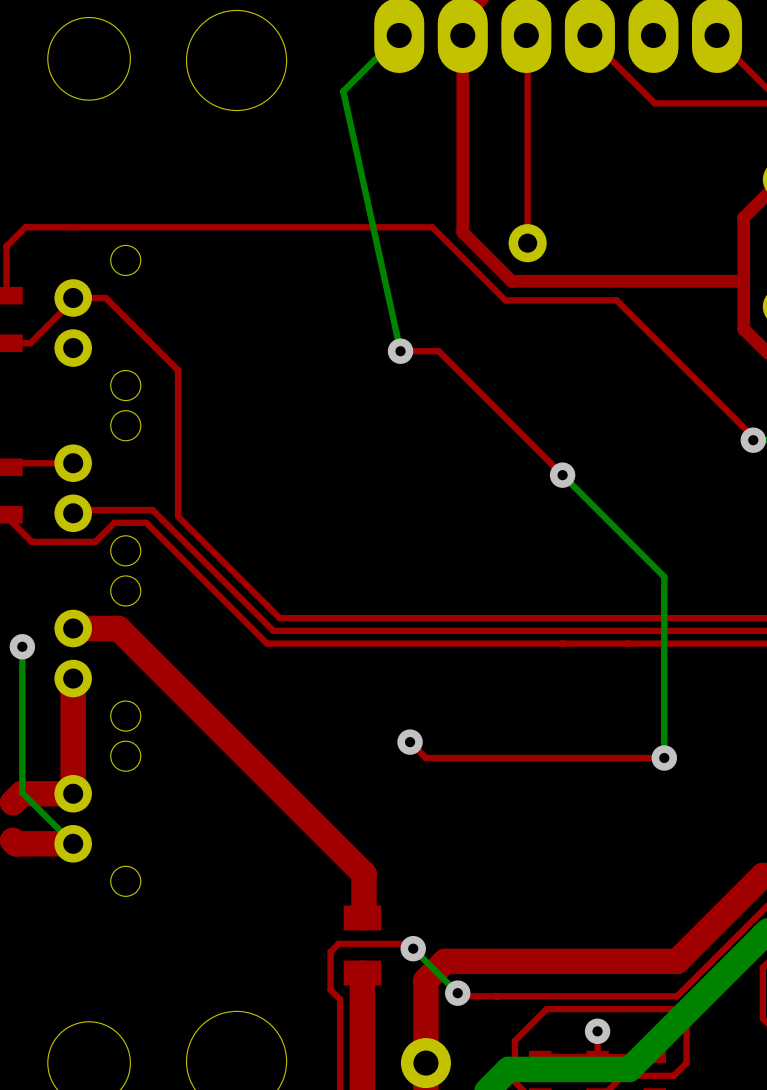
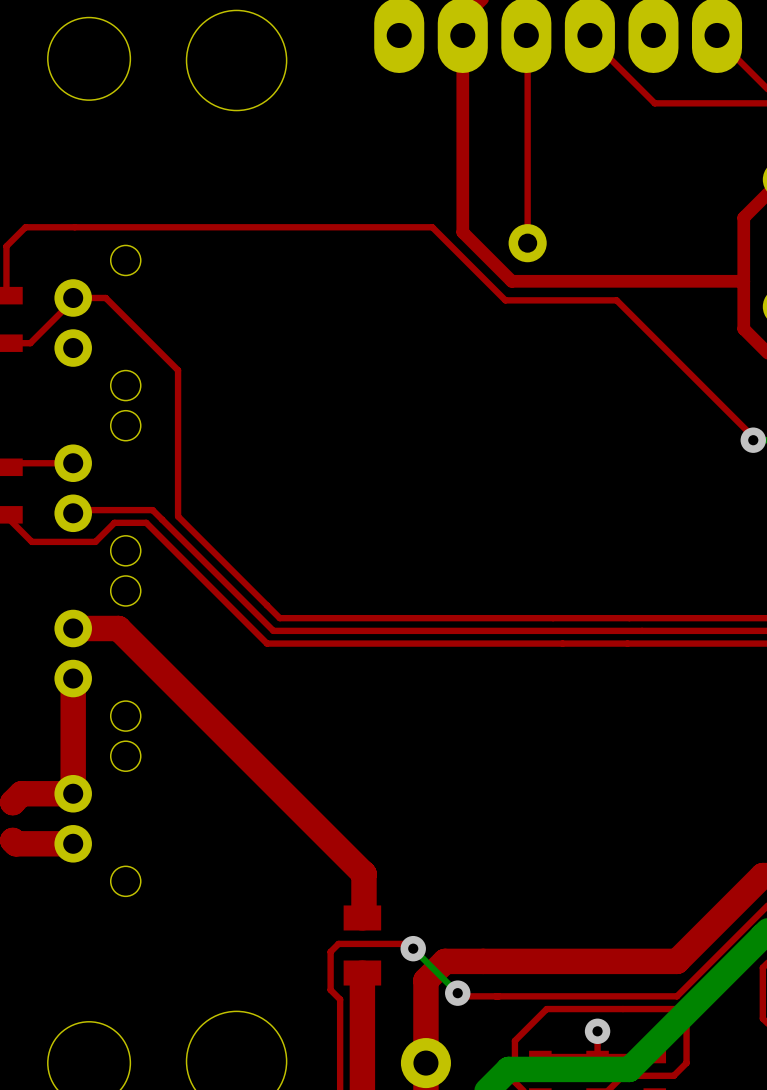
bottom track: (399, 35) (343, 91) (400, 351) -> none
top track: (400, 351) (438, 351) (562, 475) -> none
via: (400, 351) -> none
bottom track: (562, 475) (664, 576) (664, 757) -> none
via: (562, 475) -> none
bottom track: (22, 646) (22, 792) (73, 843) -> none
via: (22, 646) -> none
top track: (410, 742) (425, 757) (664, 757) -> none
via: (410, 742) -> none
via: (664, 757) -> none

